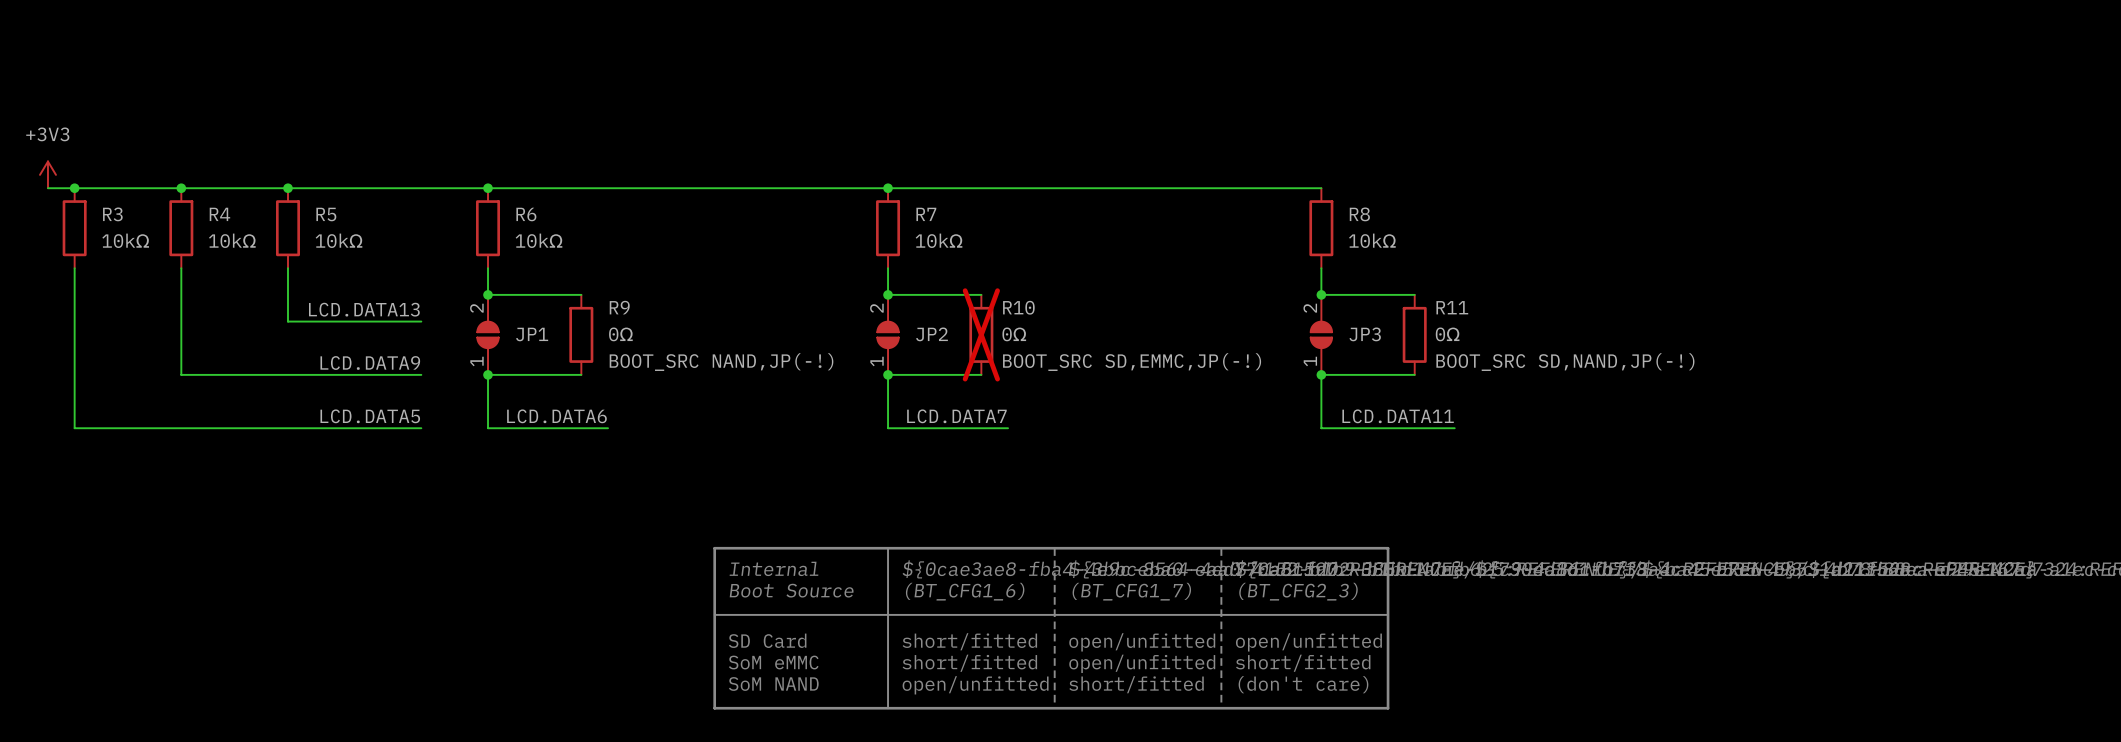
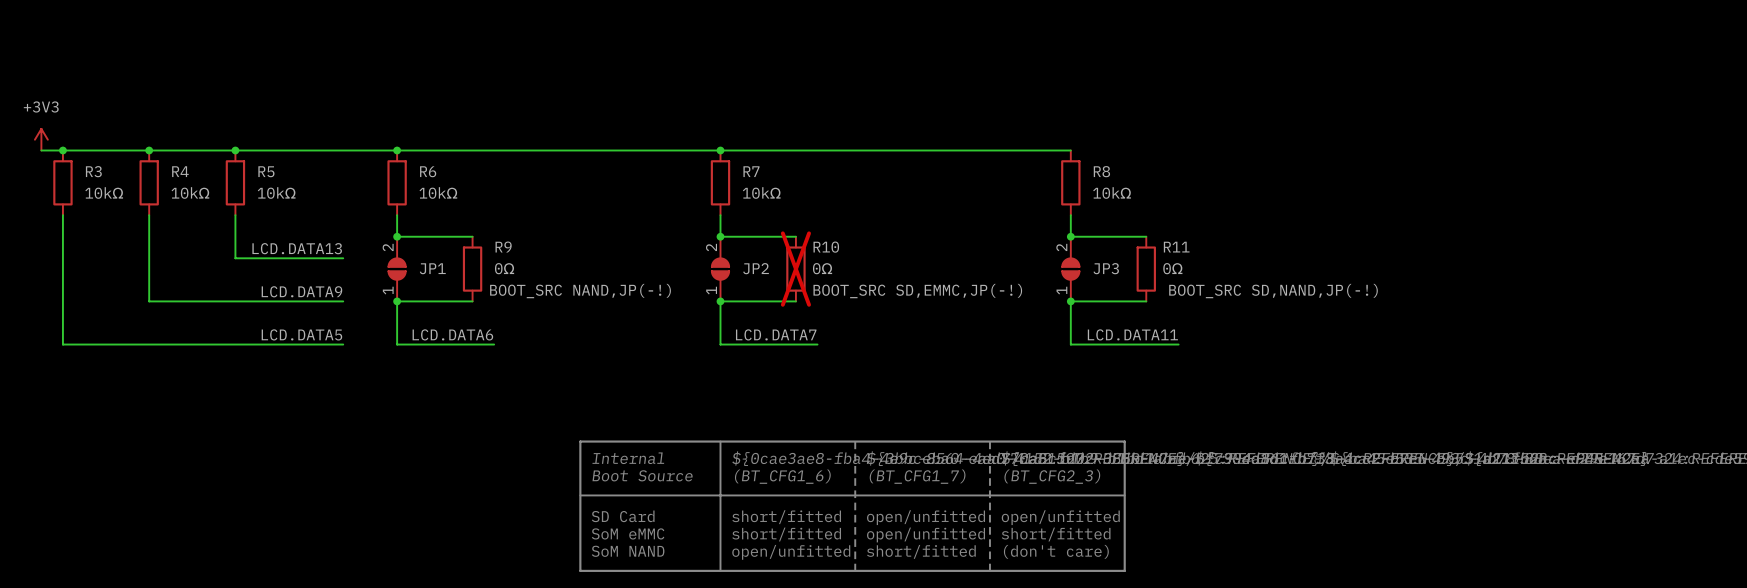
R9 text: none -> BOOT_SRC NAND,JP(-!) (580, 291)
R9 text: BOOT_SRC NAND,JP(-!) (721, 362) -> none
R11 text: BOOT_SRC SD,NAND,JP(-!) (1565, 362) -> none
R11 text: none -> BOOT_SRC SD,NAND,JP(-!) (1273, 291)

